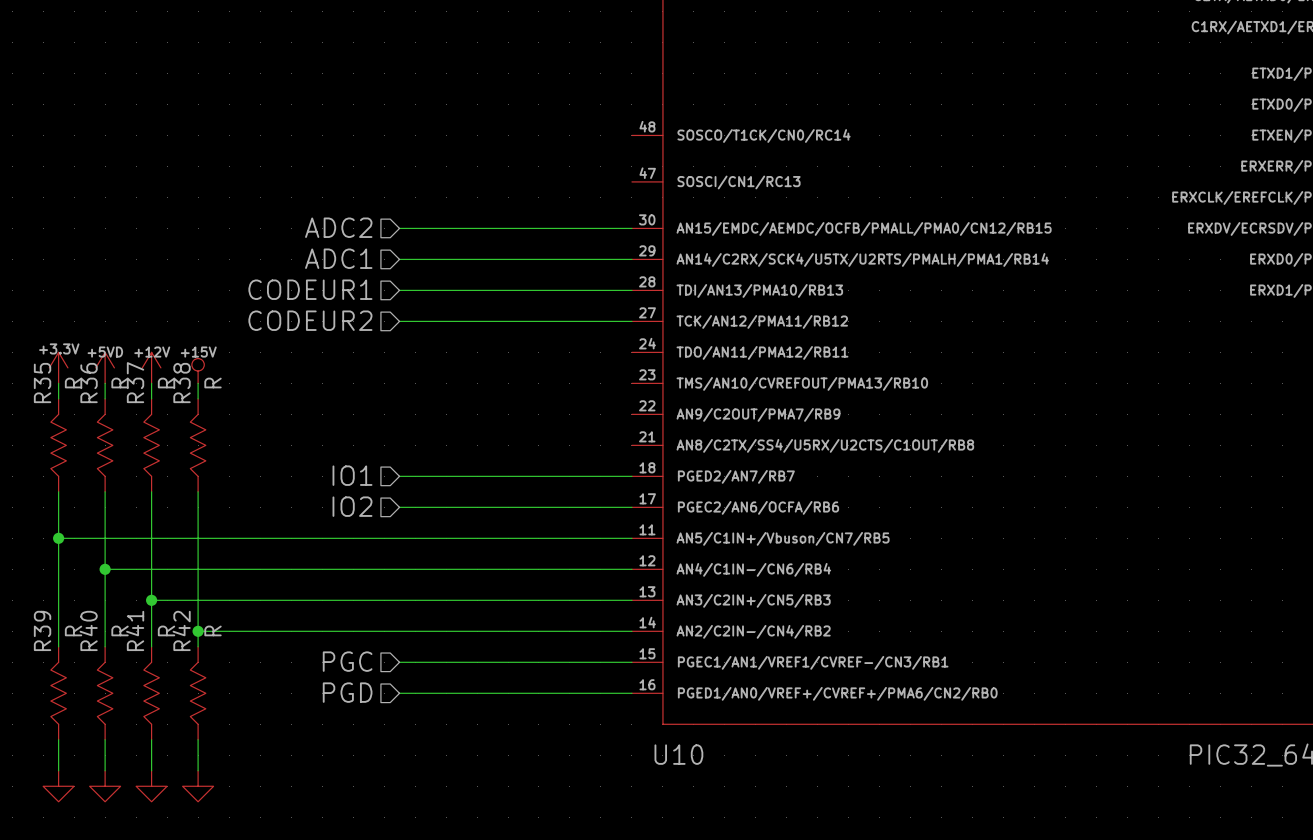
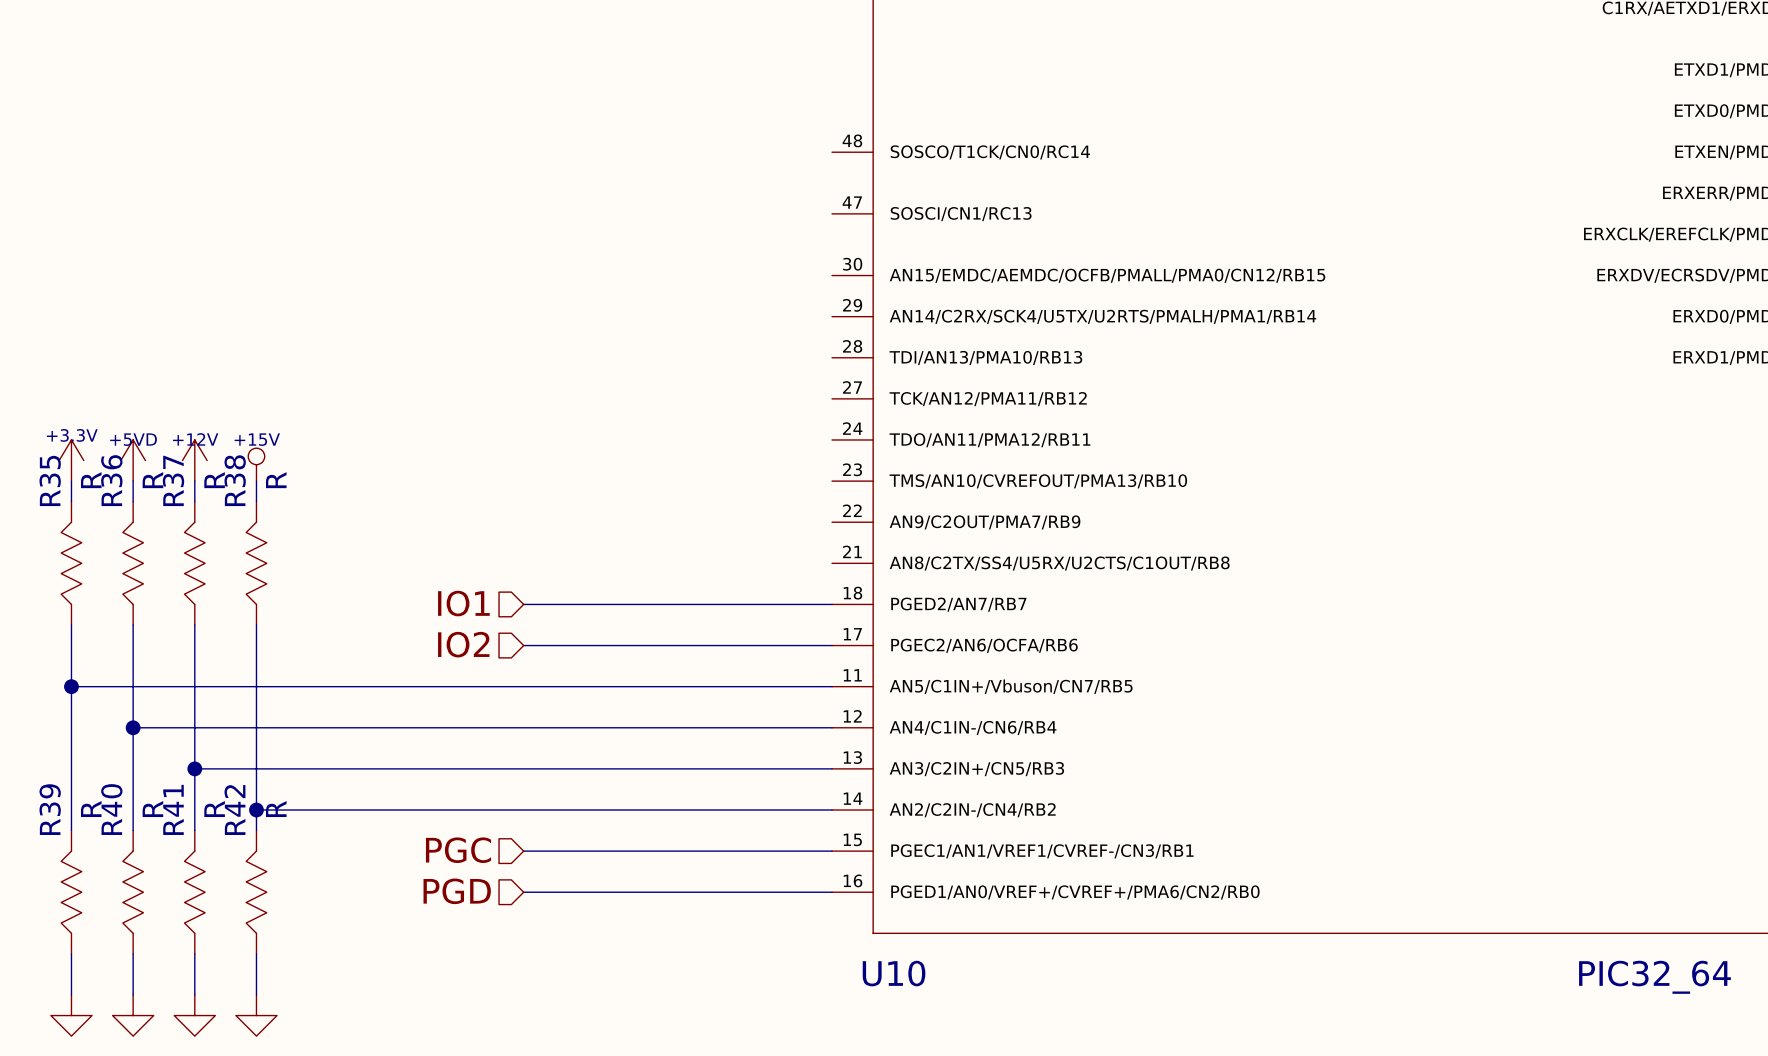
hierarchical label: ADC2 (338, 227) -> none
wire: (399, 228) (631, 228) -> none
hierarchical label: ADC1 (338, 258) -> none
wire: (399, 259) (631, 259) -> none
hierarchical label: CODEUR1 (310, 289) -> none
wire: (399, 290) (631, 290) -> none
hierarchical label: CODEUR2 (310, 320) -> none
wire: (399, 321) (631, 321) -> none

